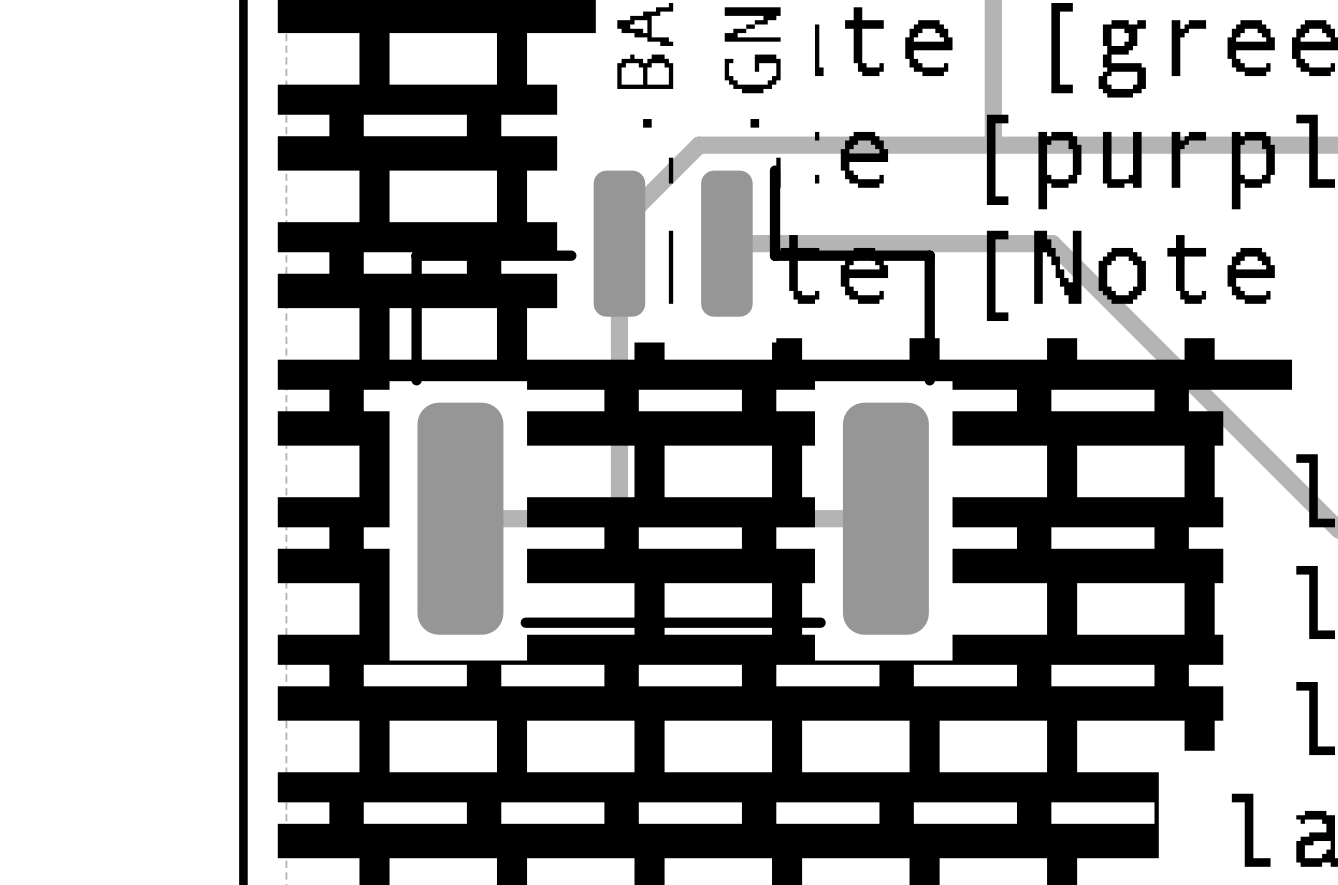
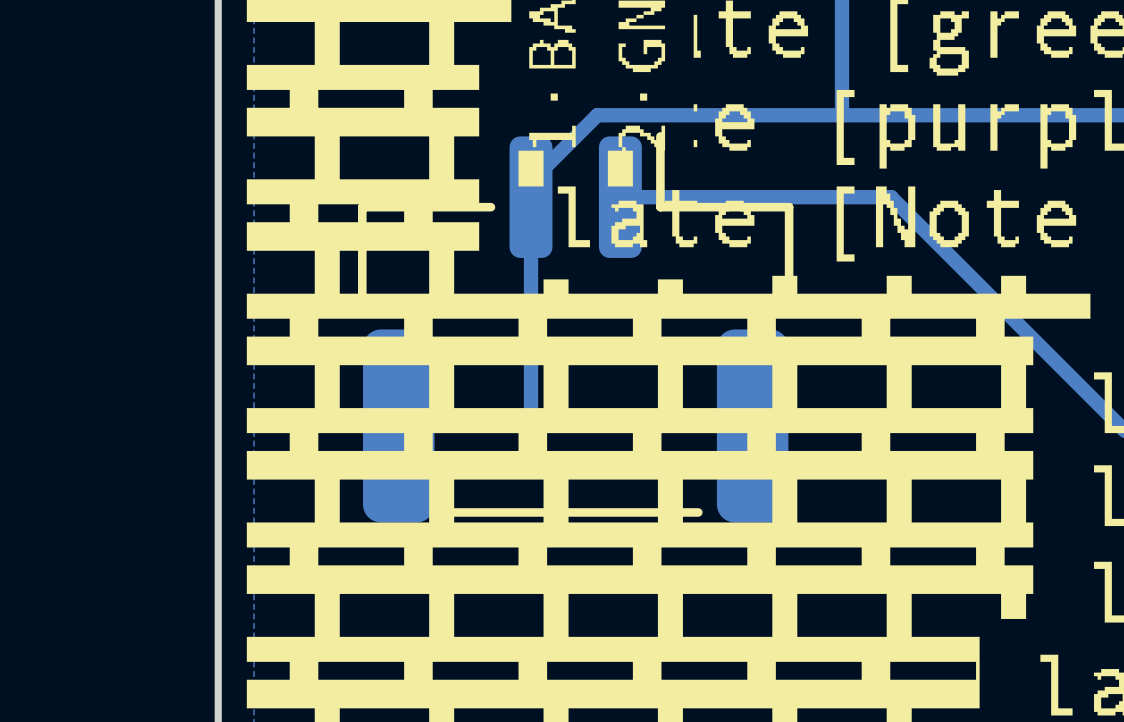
drawing: none -> [518, 125, 666, 248]
drawing: [668, 157, 674, 184] -> none
drawing shape: [668, 230, 674, 304] -> [568, 193, 576, 241]
drawing position: (789, 340) -> (632, 220)
drawing shape: [277, 359, 1293, 382] -> [246, 293, 1091, 319]
drawing: [277, 381, 390, 661] -> none
drawing: [527, 381, 815, 390] -> none
drawing: [952, 381, 1293, 661] -> none
drawing: none -> [404, 318, 455, 523]
drawing: none -> [747, 318, 798, 523]
drawing shape: [527, 411, 815, 446] -> [246, 336, 1034, 366]
drawing shape: [527, 497, 815, 528] -> [246, 408, 1034, 434]
drawing shape: [527, 548, 815, 584] -> [246, 450, 1034, 480]
drawing: [527, 634, 815, 661] -> none
drawing shape: [277, 660, 1224, 665] -> [246, 522, 1034, 548]

